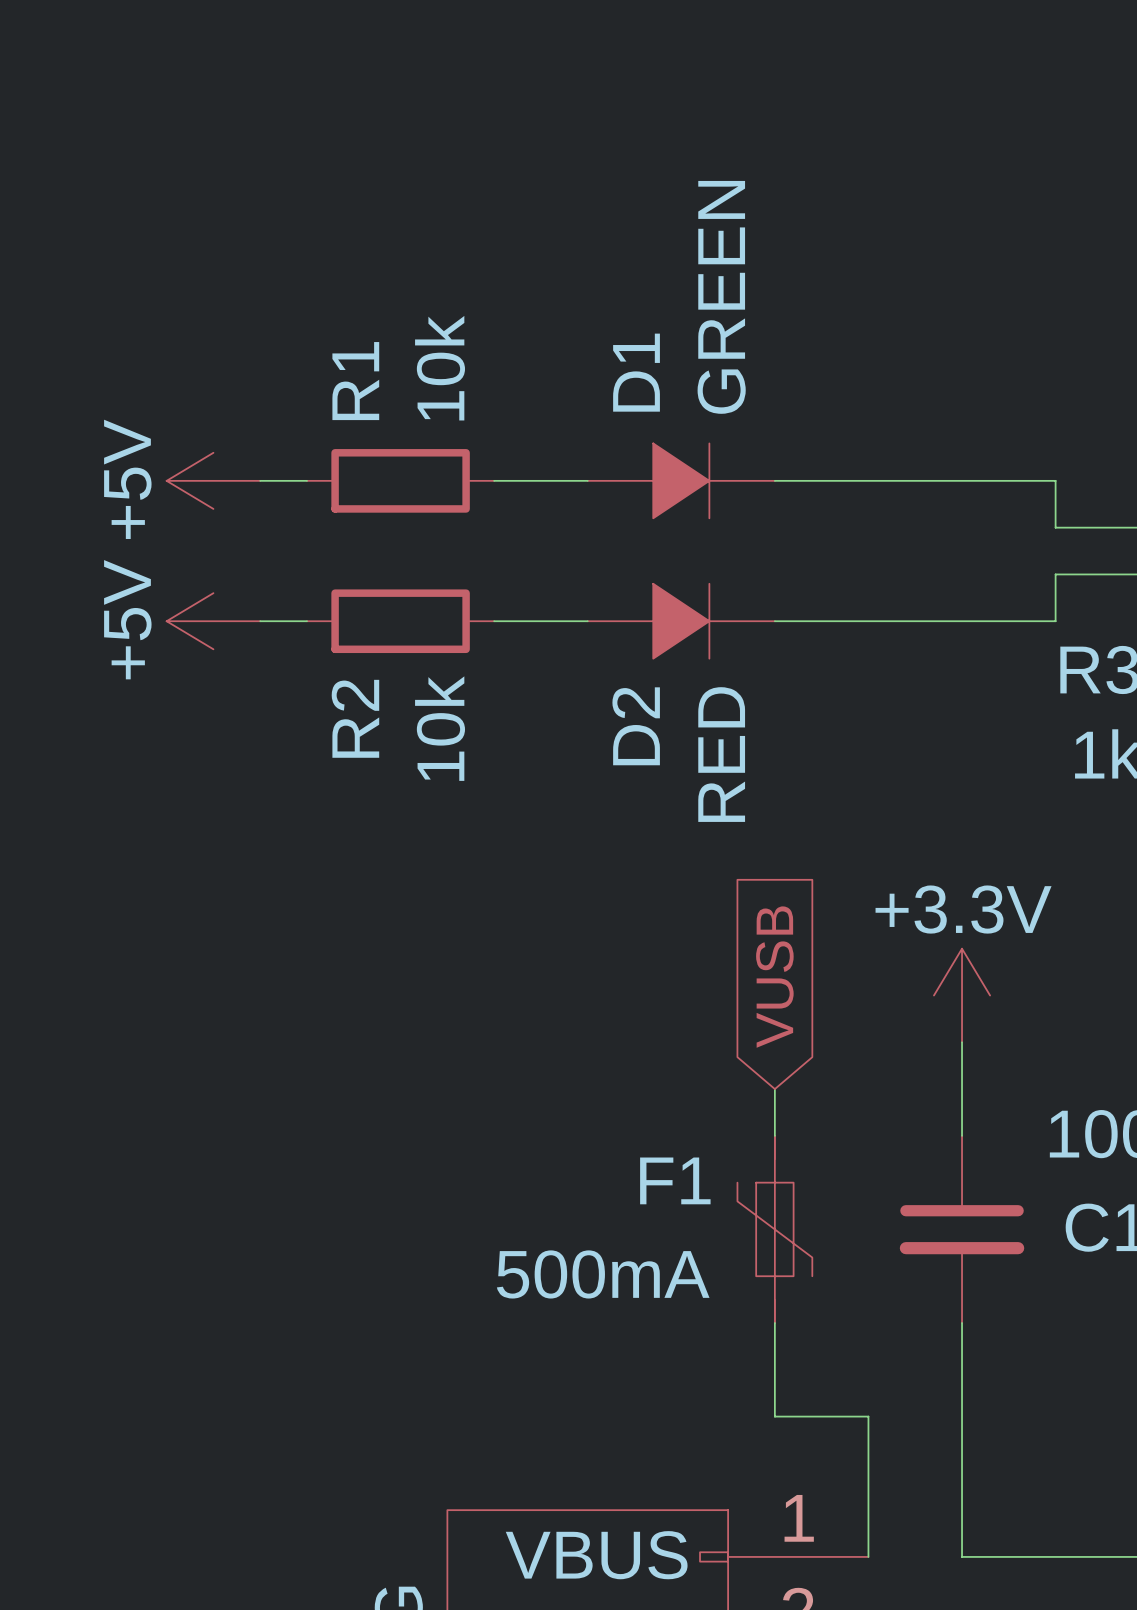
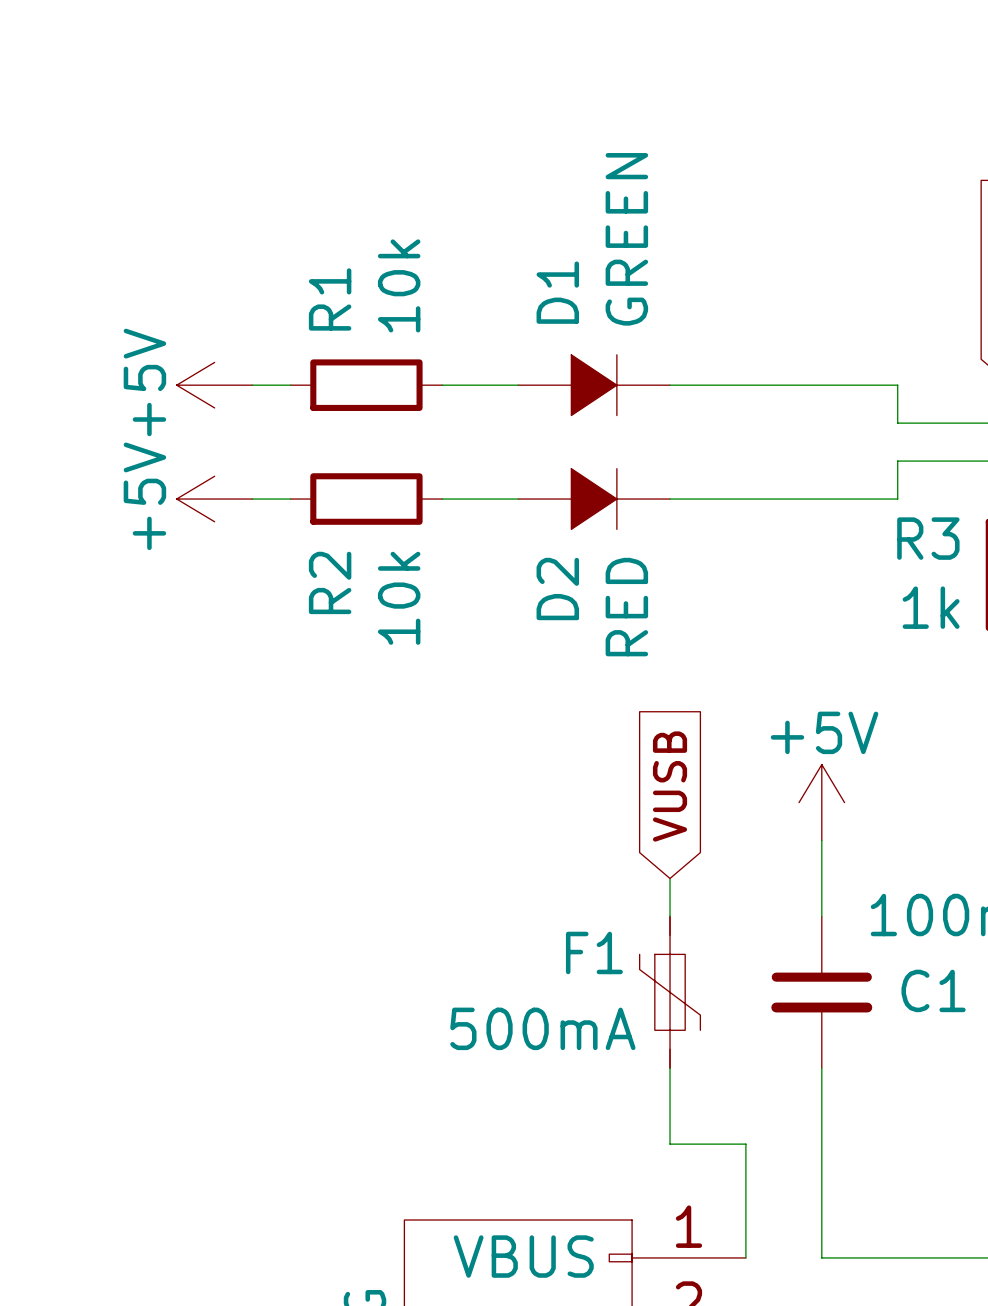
power symbol: +3.3V (962, 995) -> +5V (821, 802)

